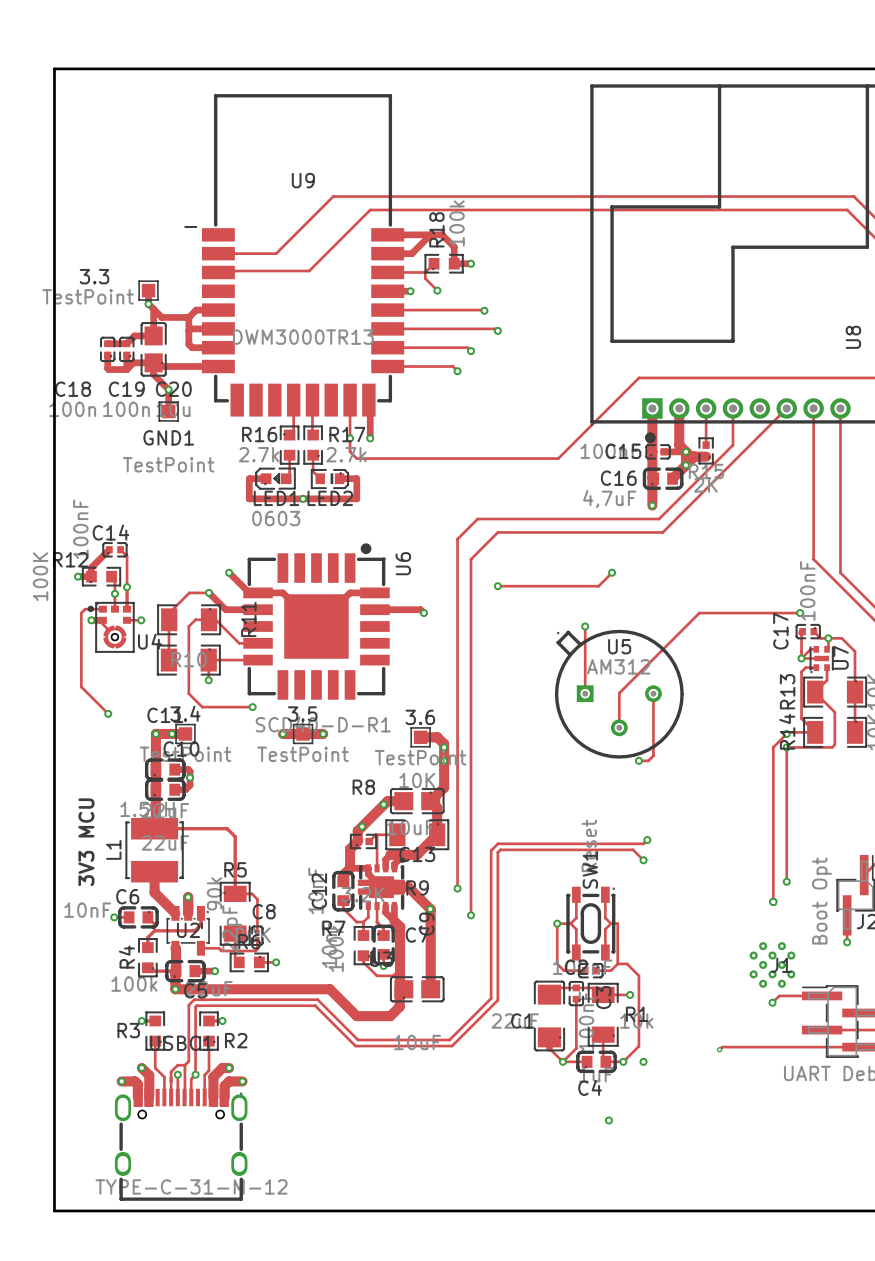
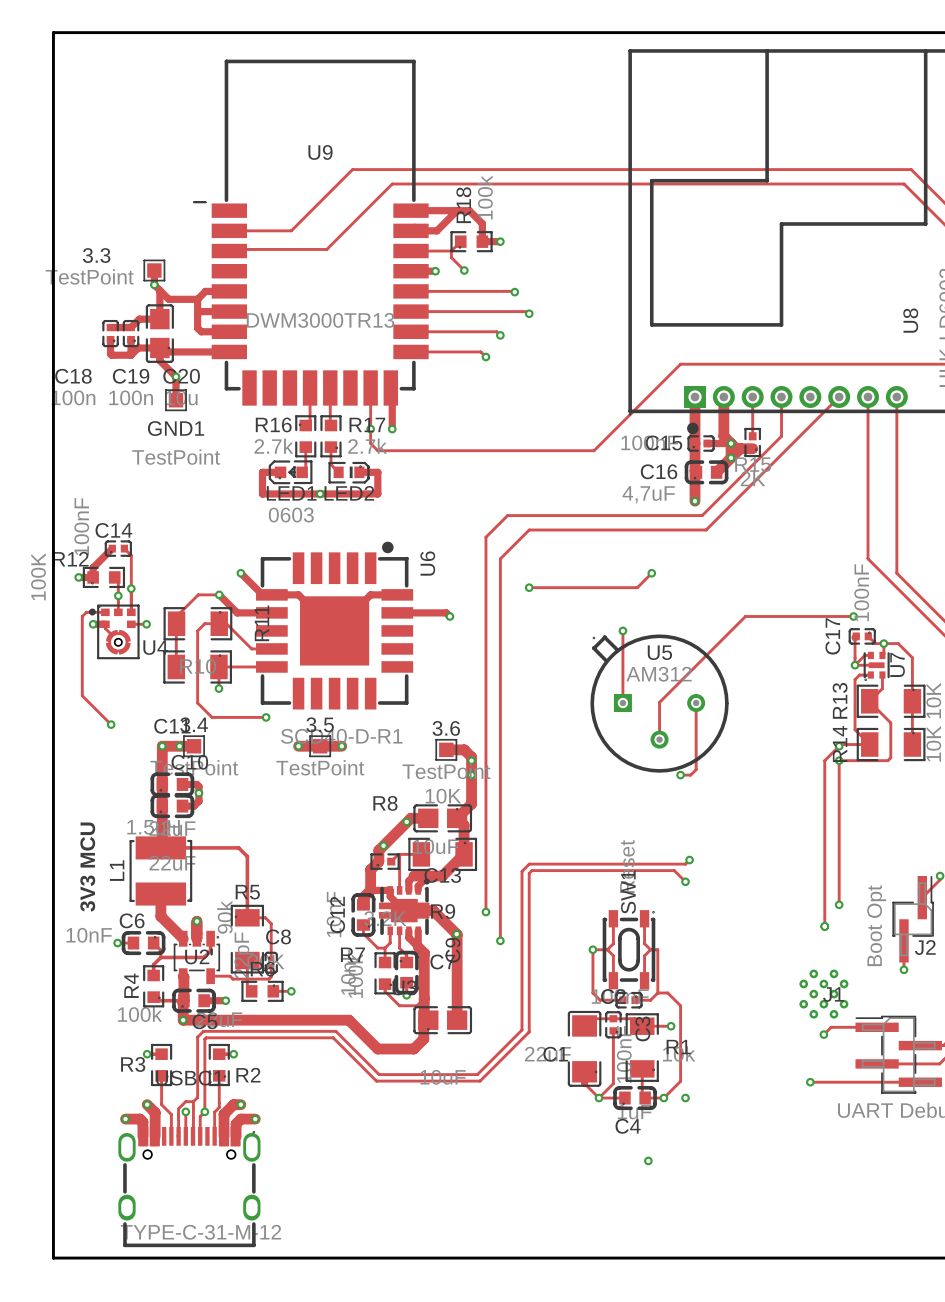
track: (759, 1047) (722, 1047) (719, 1049) -> none
via: none -> (810, 1082)
via: (719, 1049) -> none

